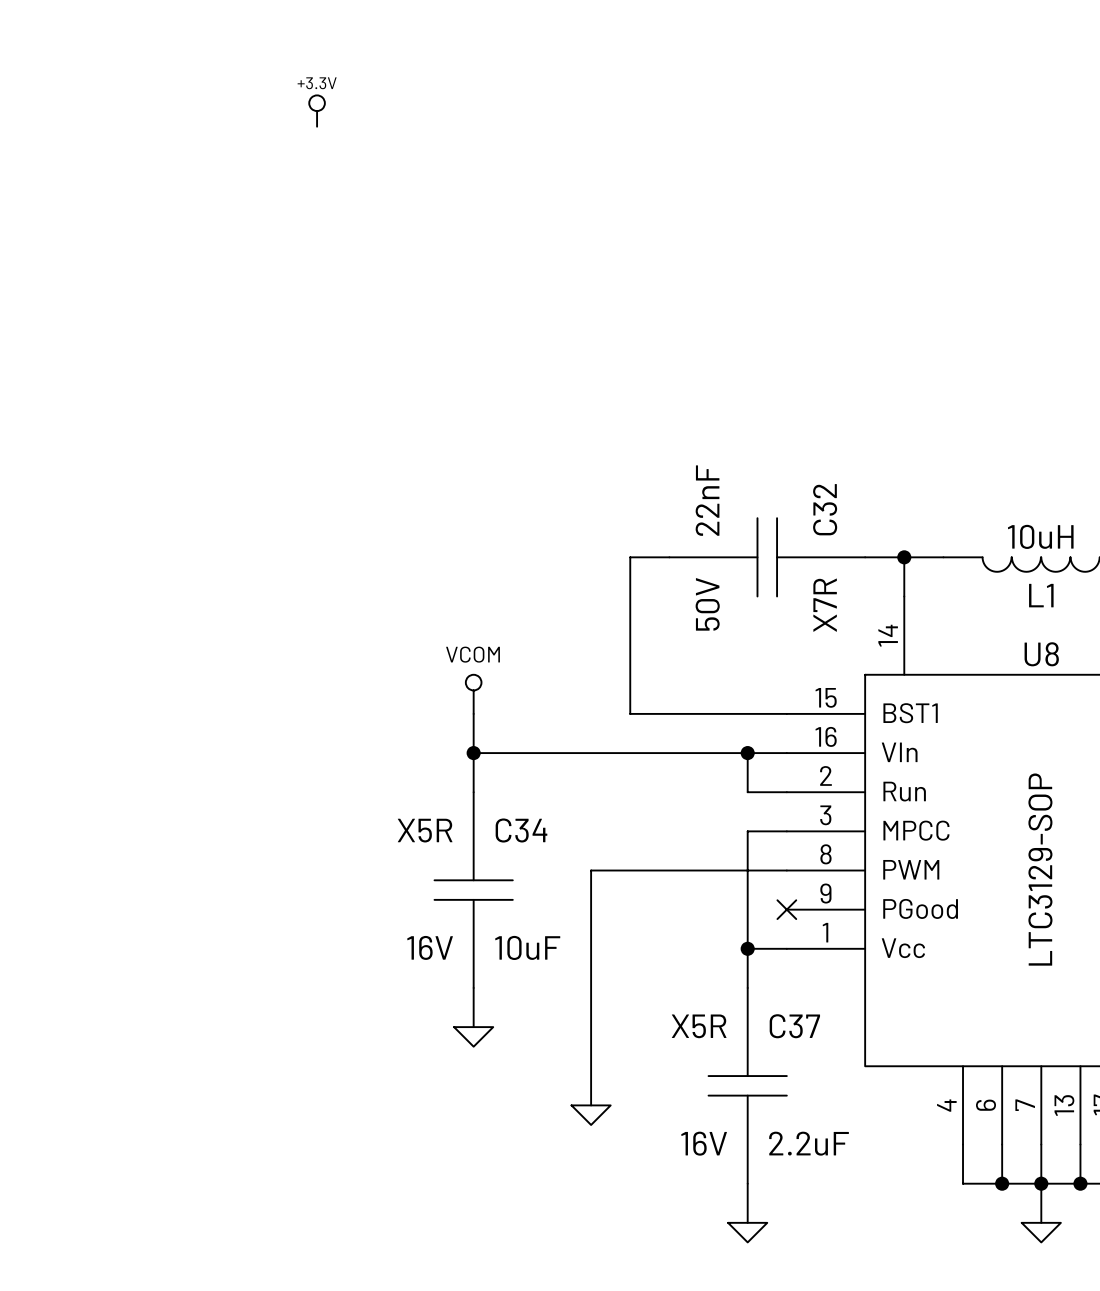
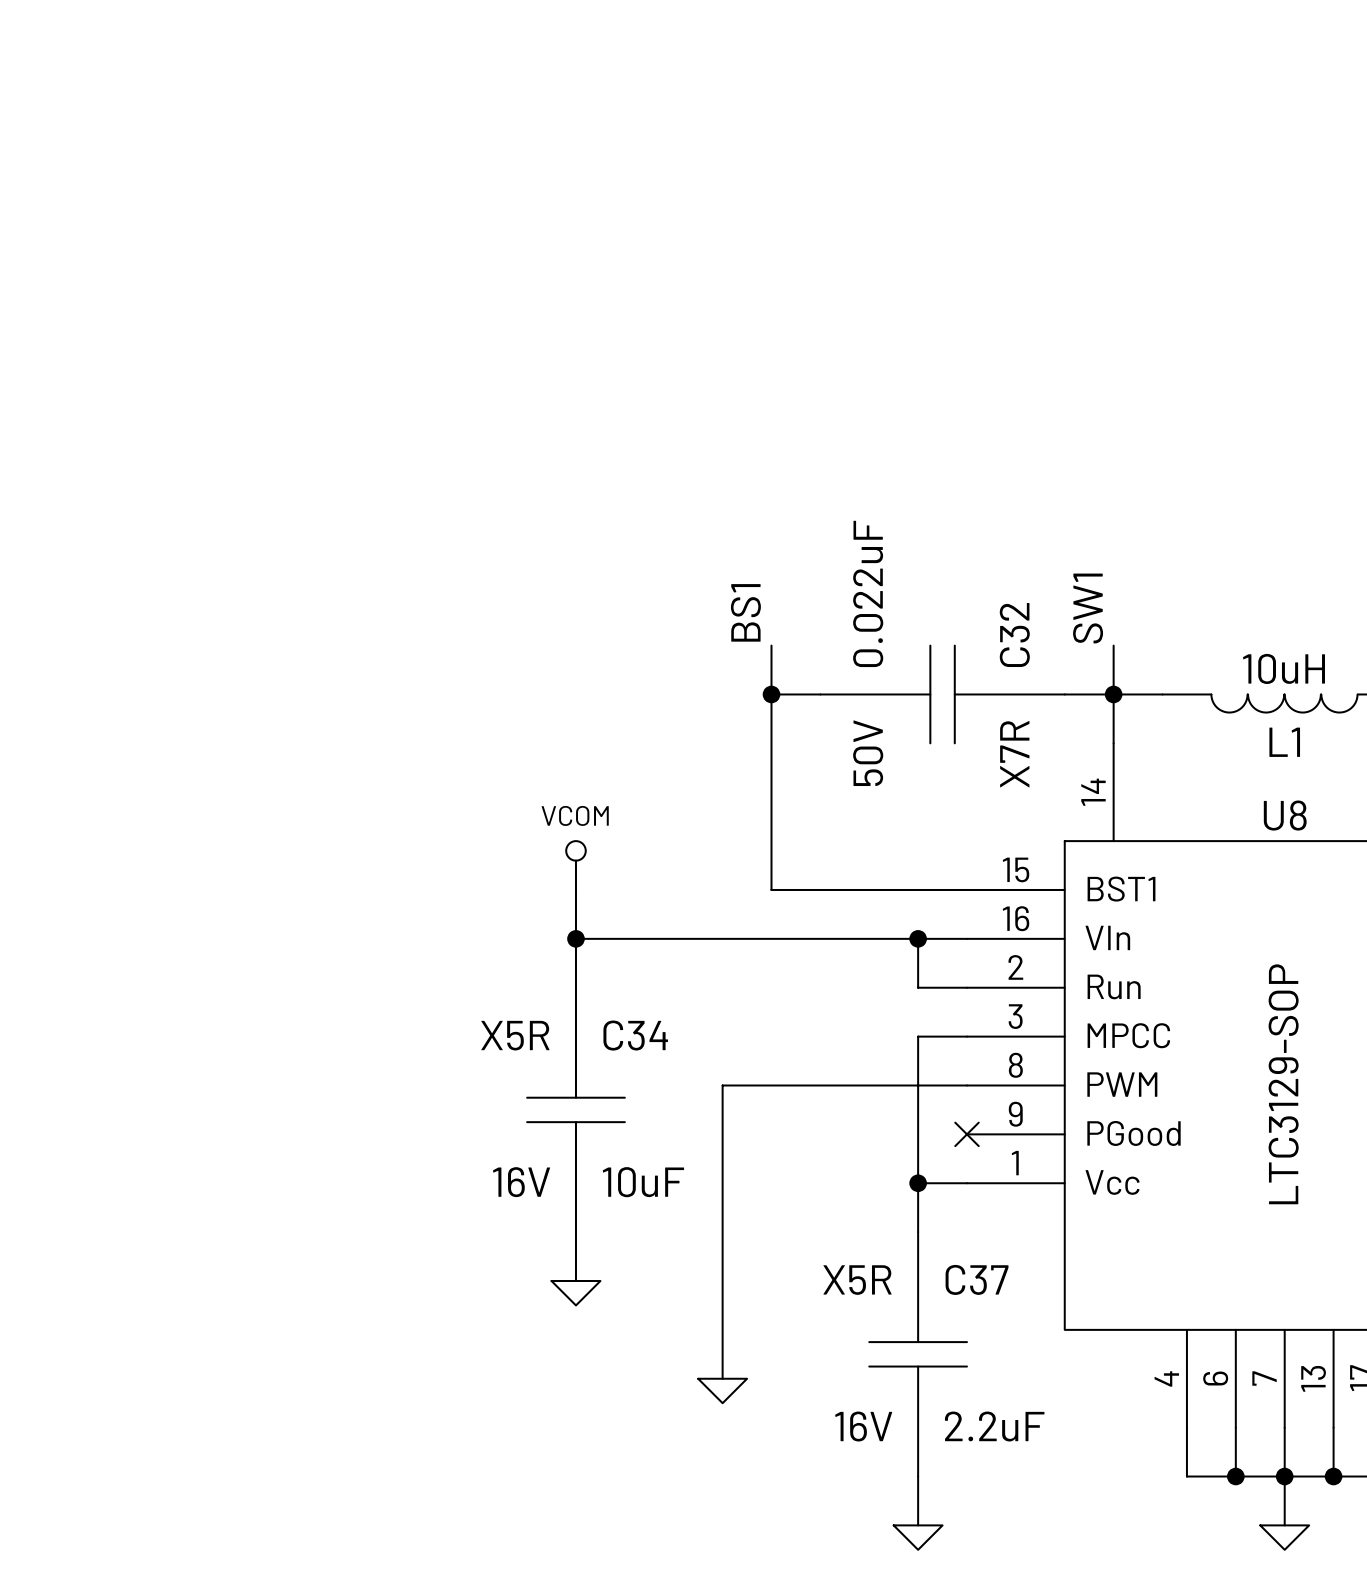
power symbol: +3.3V (317, 111) -> none
label: none -> SW1 (1088, 608)
label: none -> BS1 (745, 612)
C32 value: 22nF (707, 500) -> 0.022uF (868, 593)
wire: none -> (771, 645) (771, 694)
wire: none -> (1113, 645) (1113, 694)
junction: none -> (771, 694)

